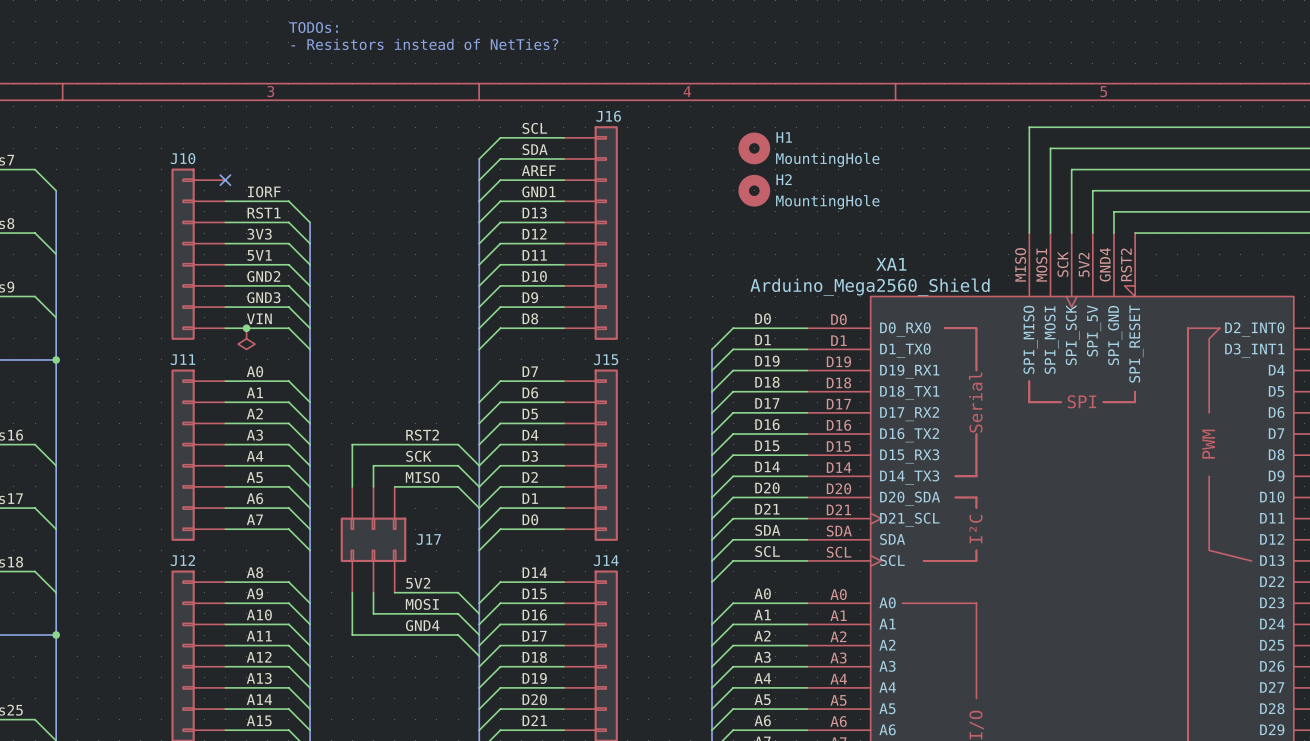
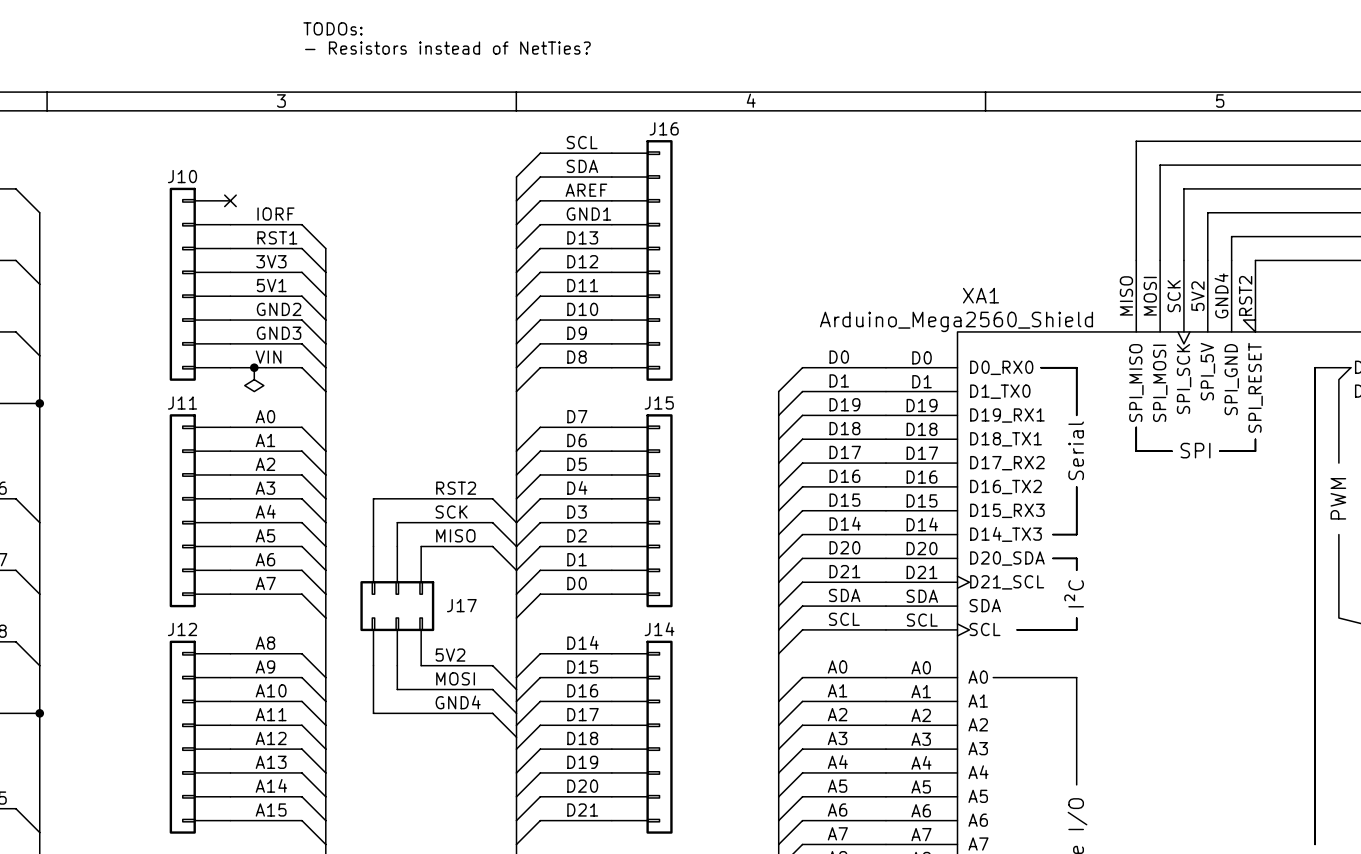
H1: MountingHole (754, 148) -> none
H2: MountingHole (754, 190) -> none

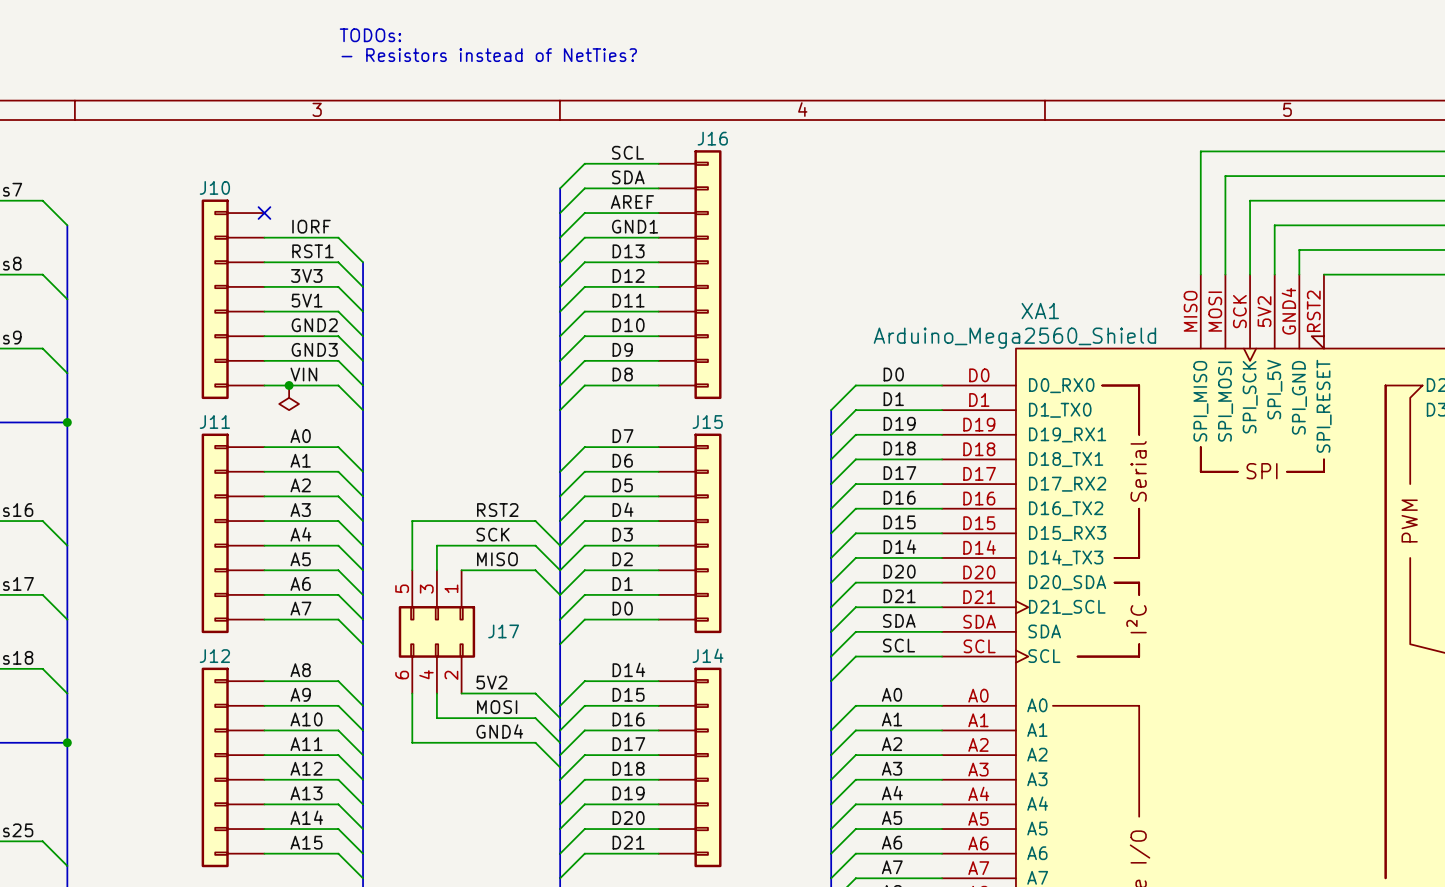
J17 pin number: none -> 5 (402, 588)
J17 pin number: none -> 3 (426, 589)
J17 pin number: none -> 1 (451, 588)
J17 pin number: none -> 6 (402, 675)
J17 pin number: none -> 4 (426, 674)
J17 pin number: none -> 2 (451, 675)

